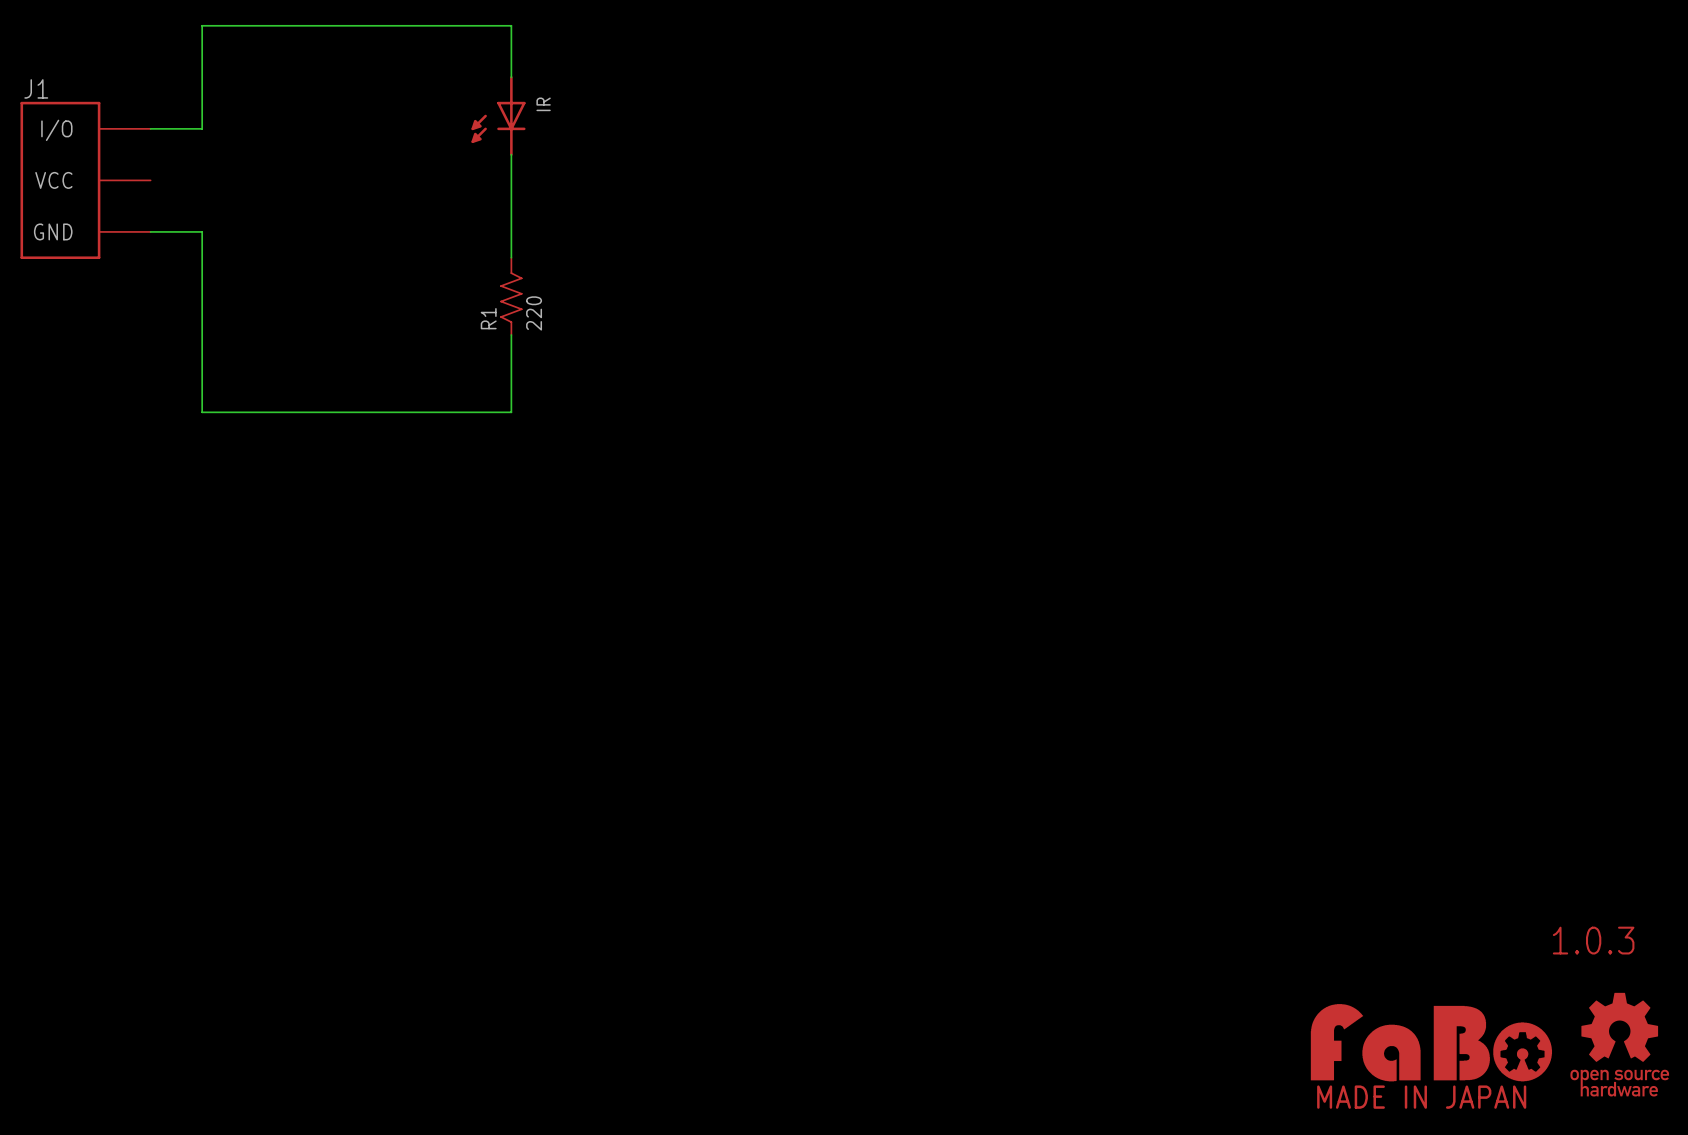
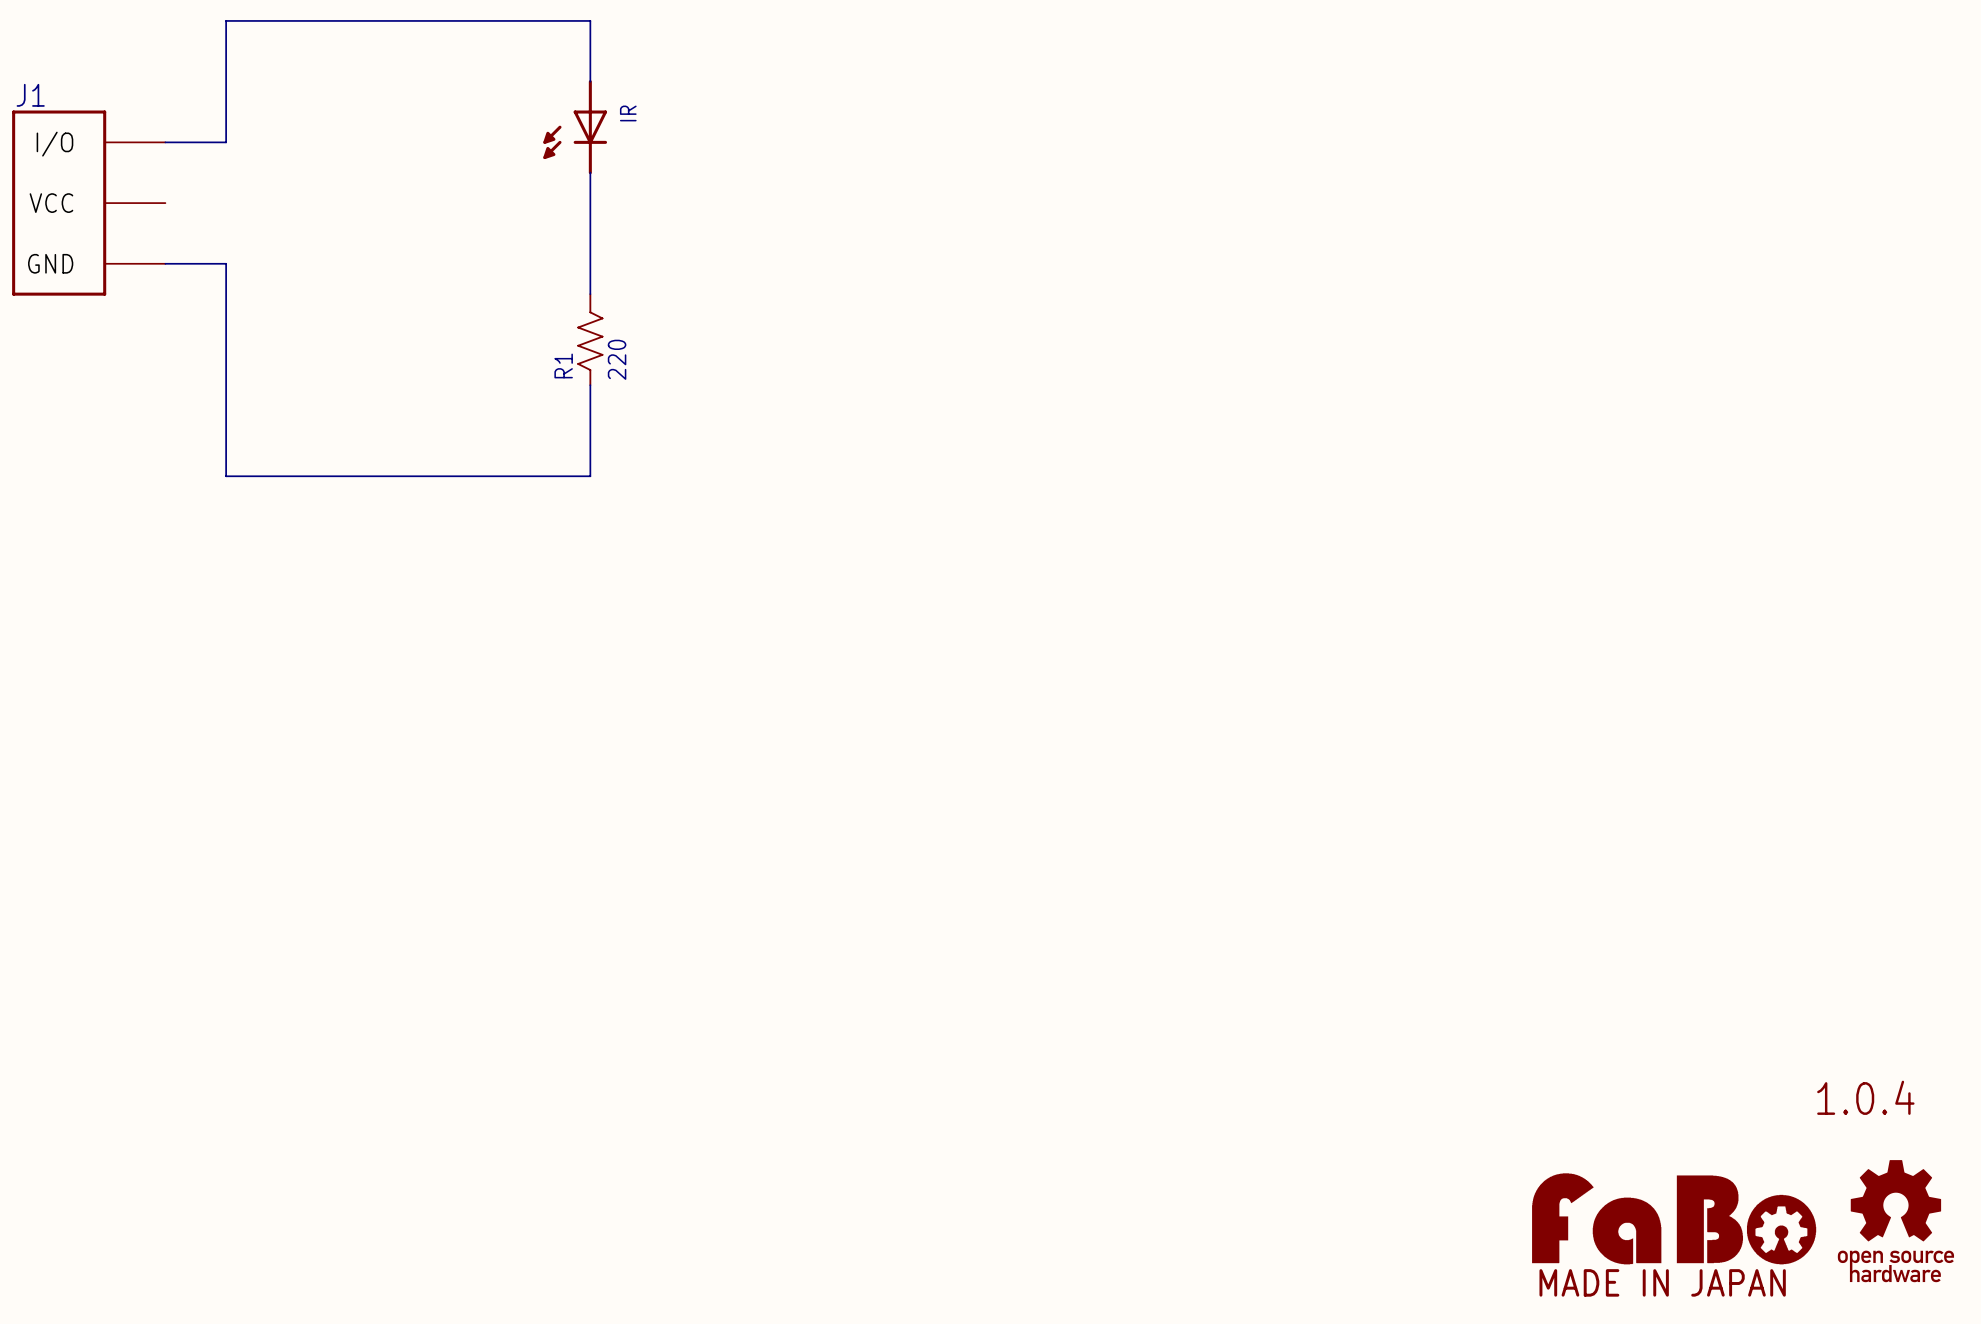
text: 1.0.3 (1593, 940) -> 1.0.4 (1865, 1097)

